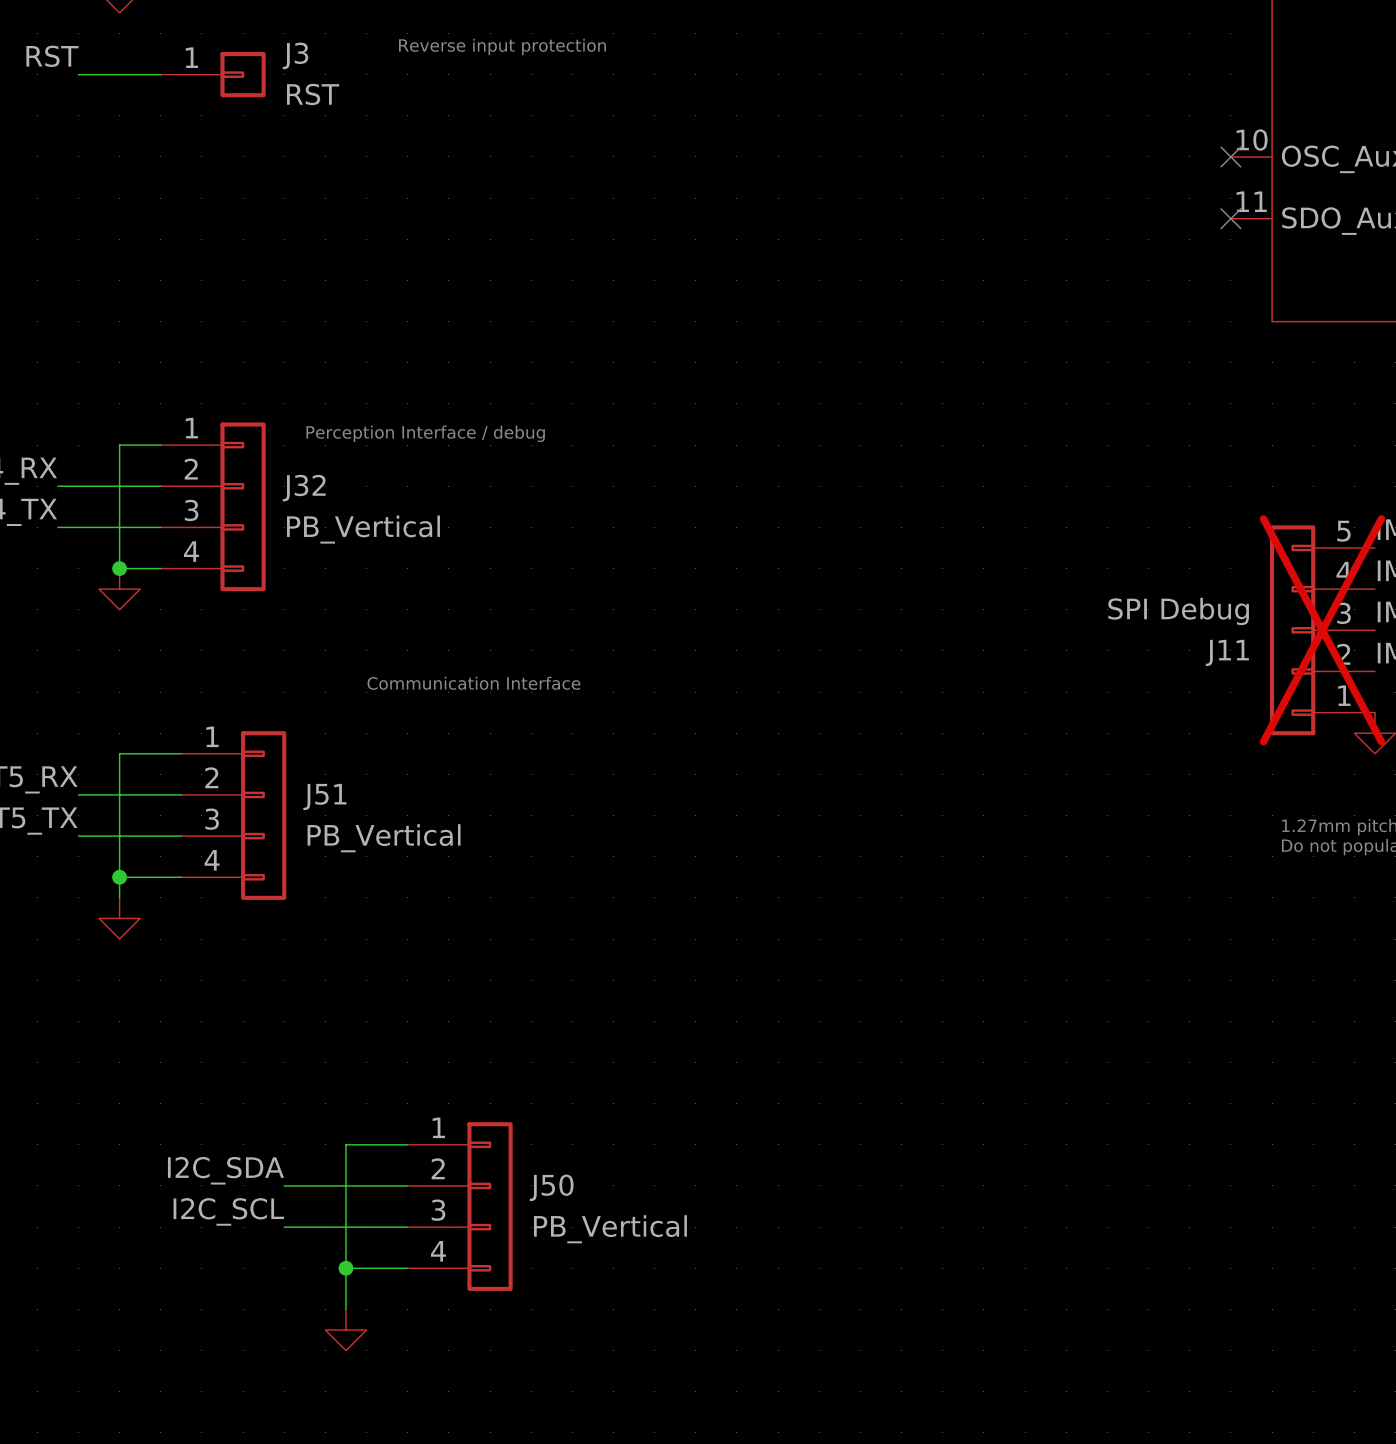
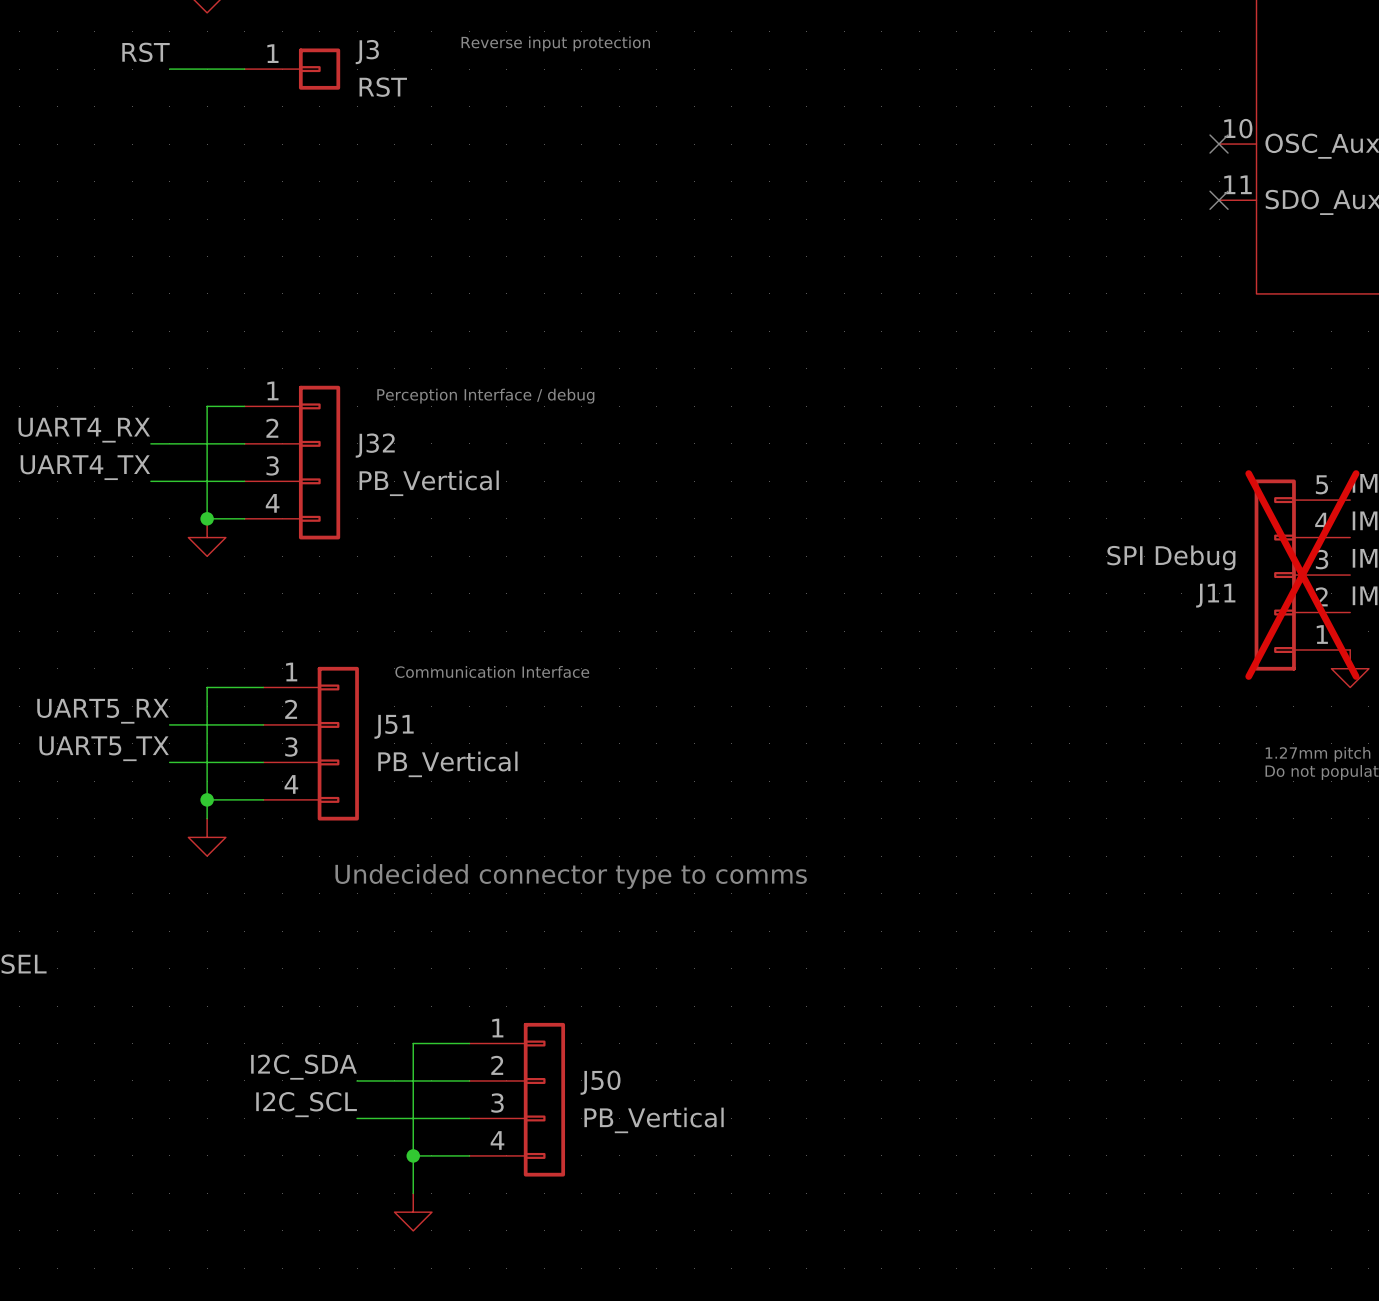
text position: Communication Interface (473, 683) -> Communication Interface (492, 671)
text: none -> Undecided connector type to comms (571, 876)

